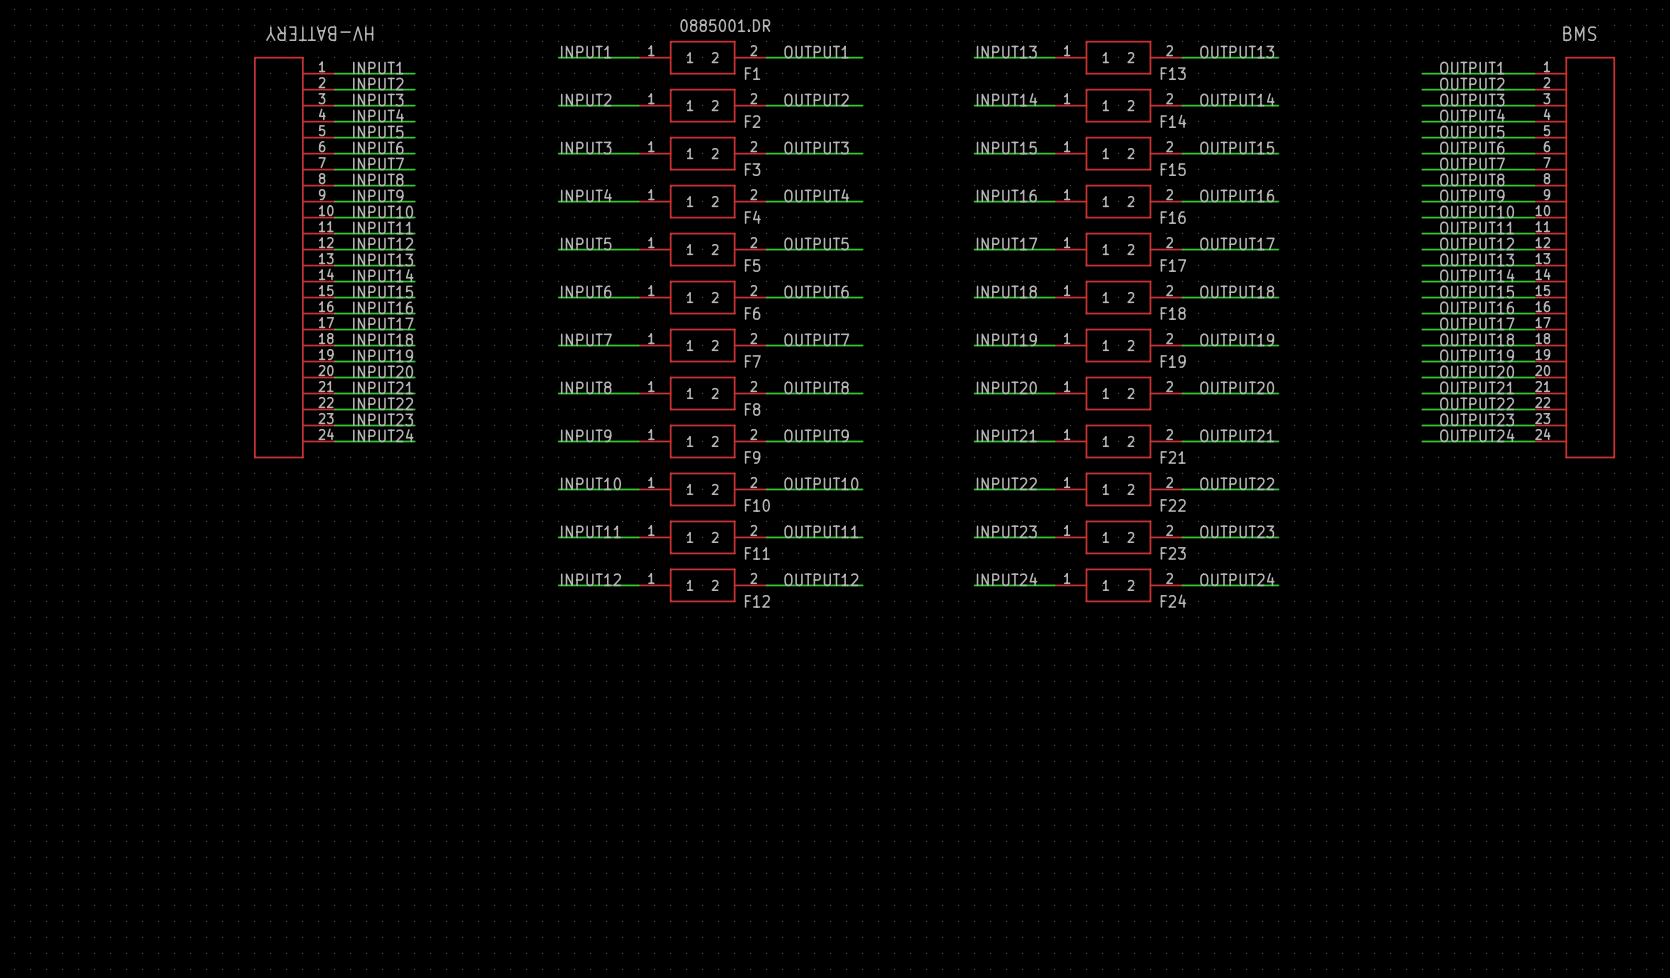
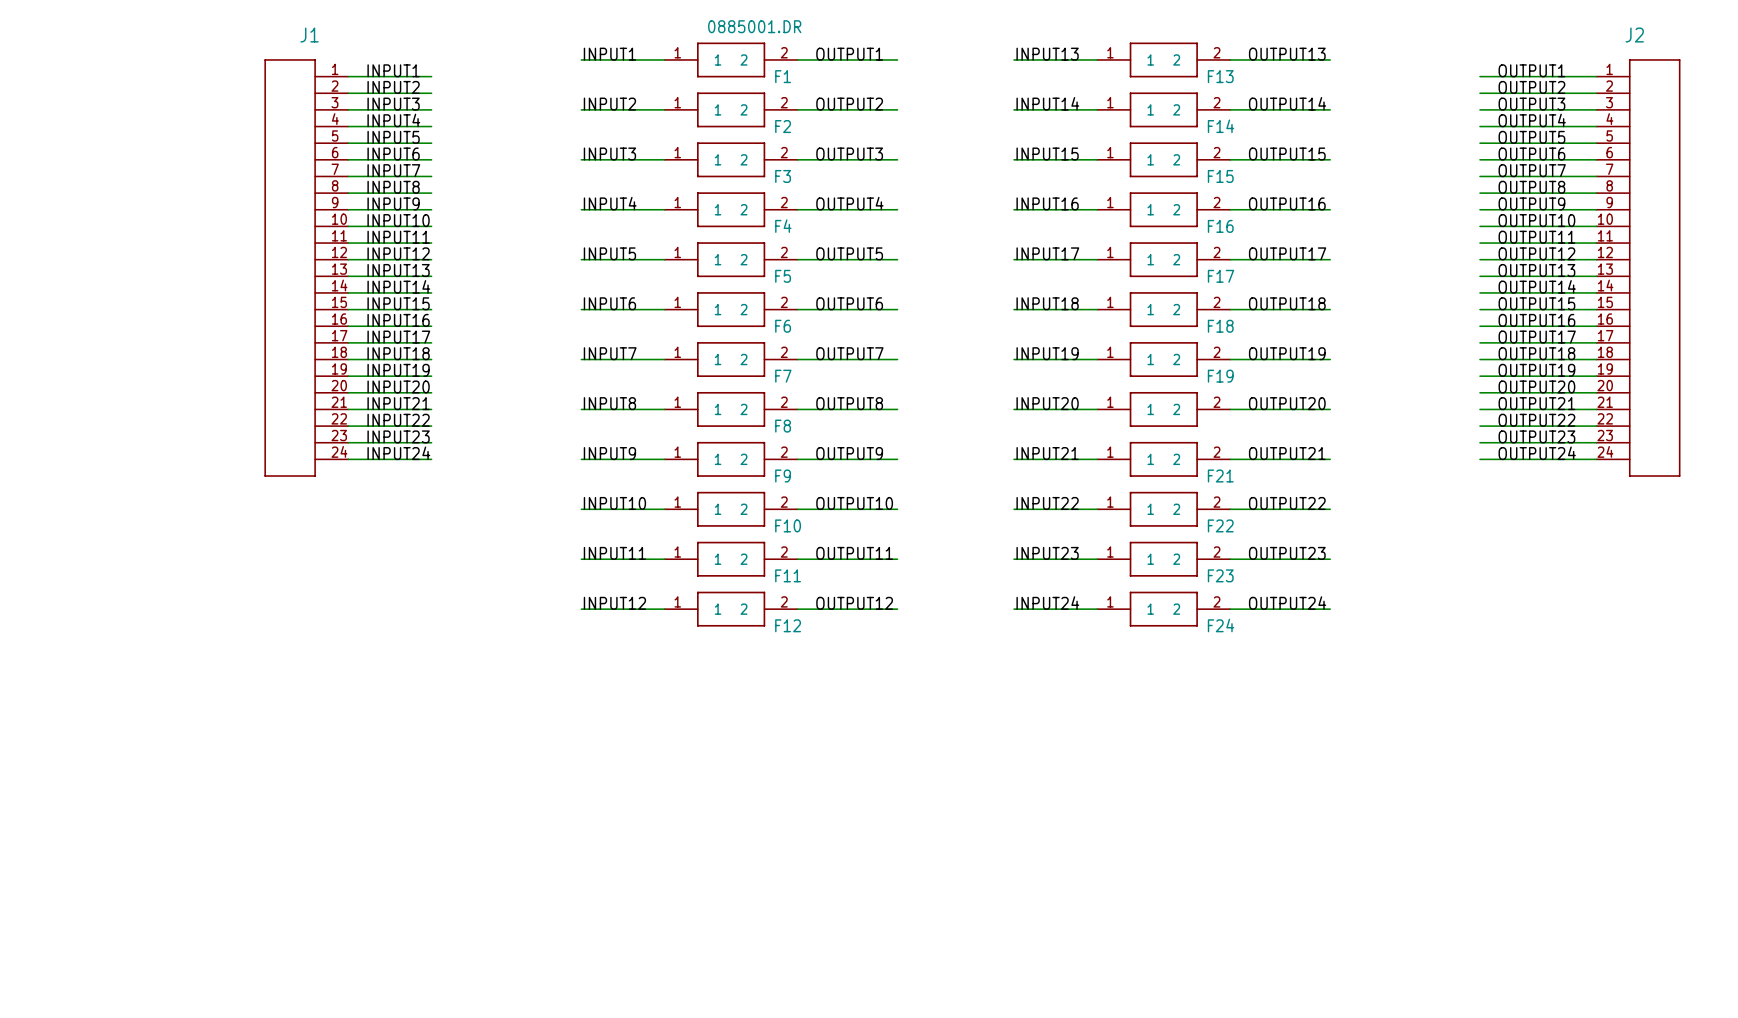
HV-BATTERY name: HV-BATTERY (319, 33) -> J1 (309, 35)
BMS name: BMS (1579, 33) -> J2 (1634, 35)

